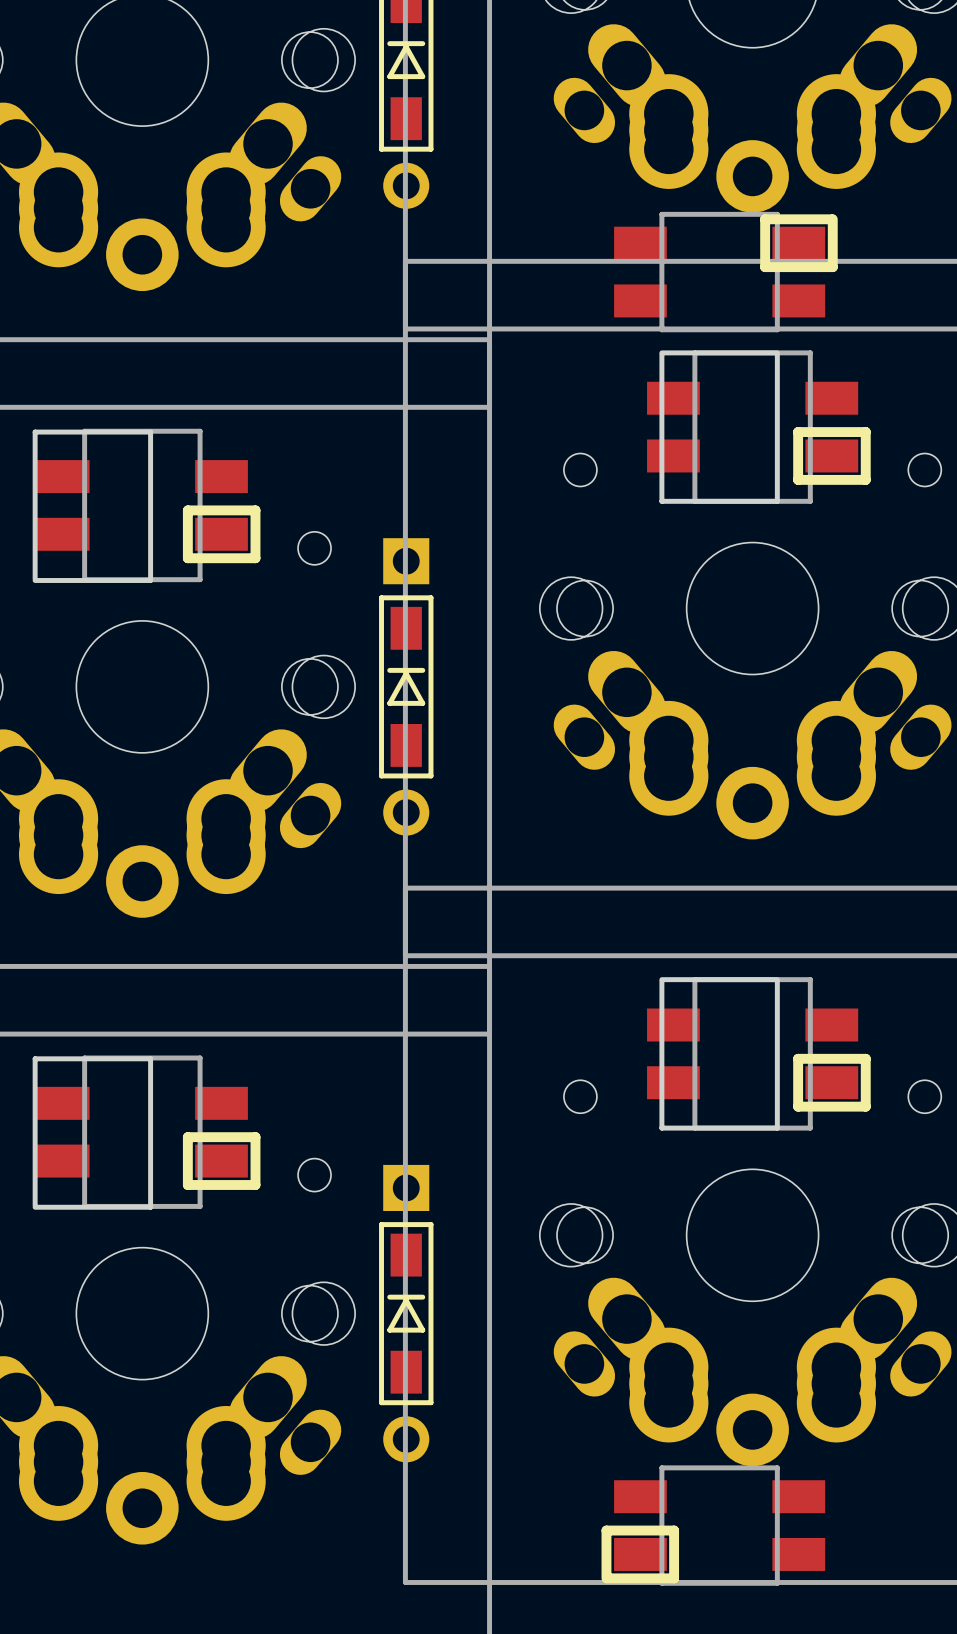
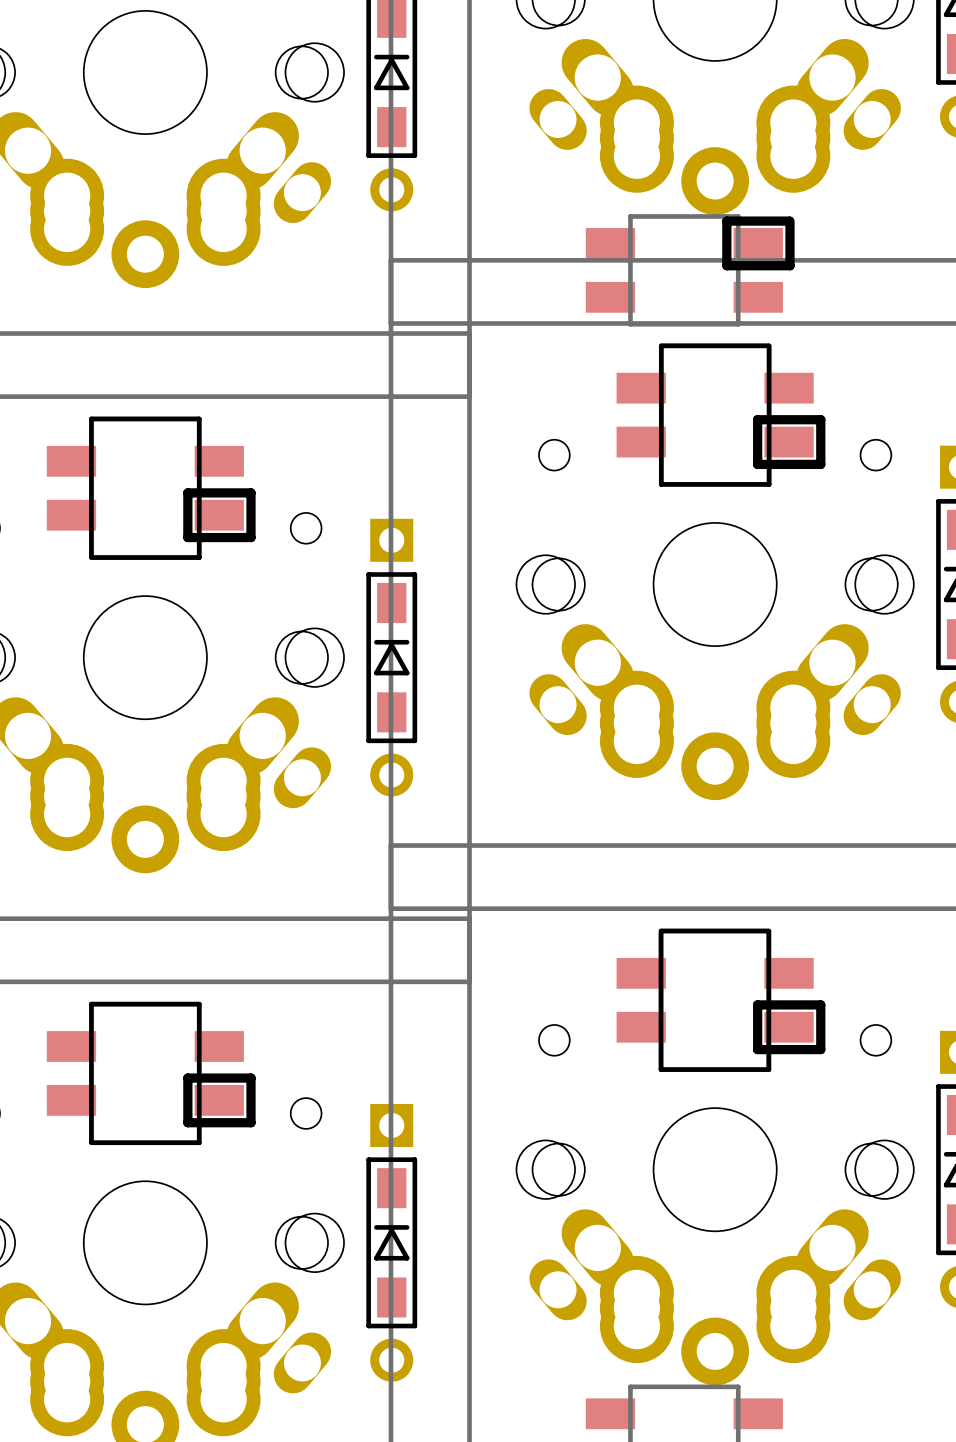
board edge: (661, 352) (694, 352) -> (738, 345) (769, 345)
board edge: (661, 354) (661, 501) (694, 501) -> (661, 347) (661, 484)
board edge: (777, 354) (777, 501) -> (769, 347) (769, 484) (738, 484)
board edge: (35, 578) (35, 432) (150, 432) (150, 580) (35, 580) -> (91, 556) (91, 418) (199, 418) (199, 557) (91, 557)
board edge: (661, 979) (694, 979) -> (738, 931) (768, 931)
board edge: (661, 981) (661, 1128) (694, 1128) -> (660, 932) (660, 1069)
board edge: (777, 981) (777, 1128) -> (768, 932) (768, 1069) (738, 1069)
board edge: (35, 1205) (35, 1058) (150, 1058) (150, 1207) (35, 1207) -> (91, 1141) (91, 1004) (199, 1004) (199, 1142) (91, 1142)

